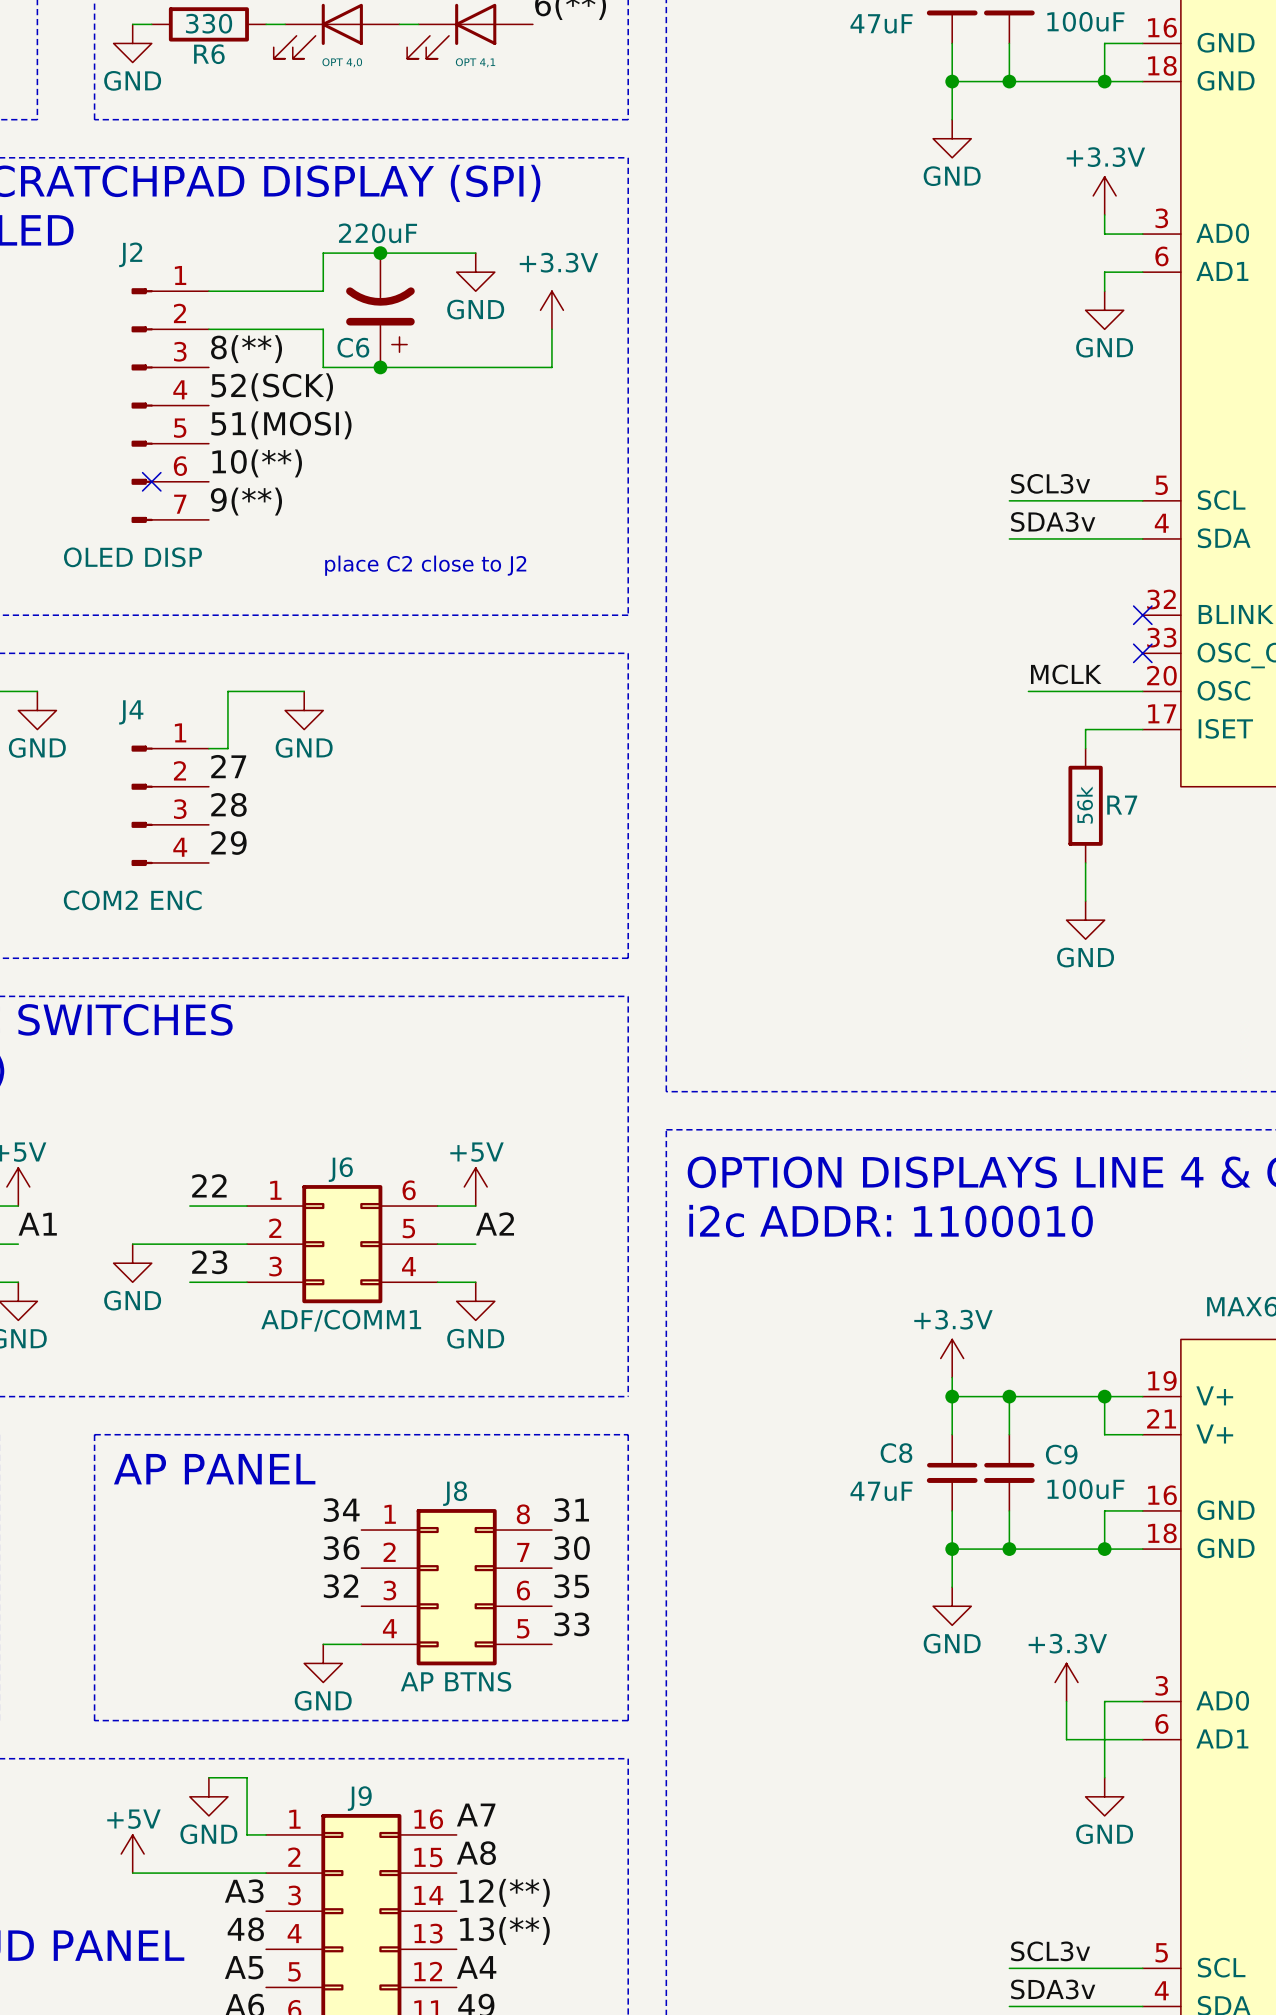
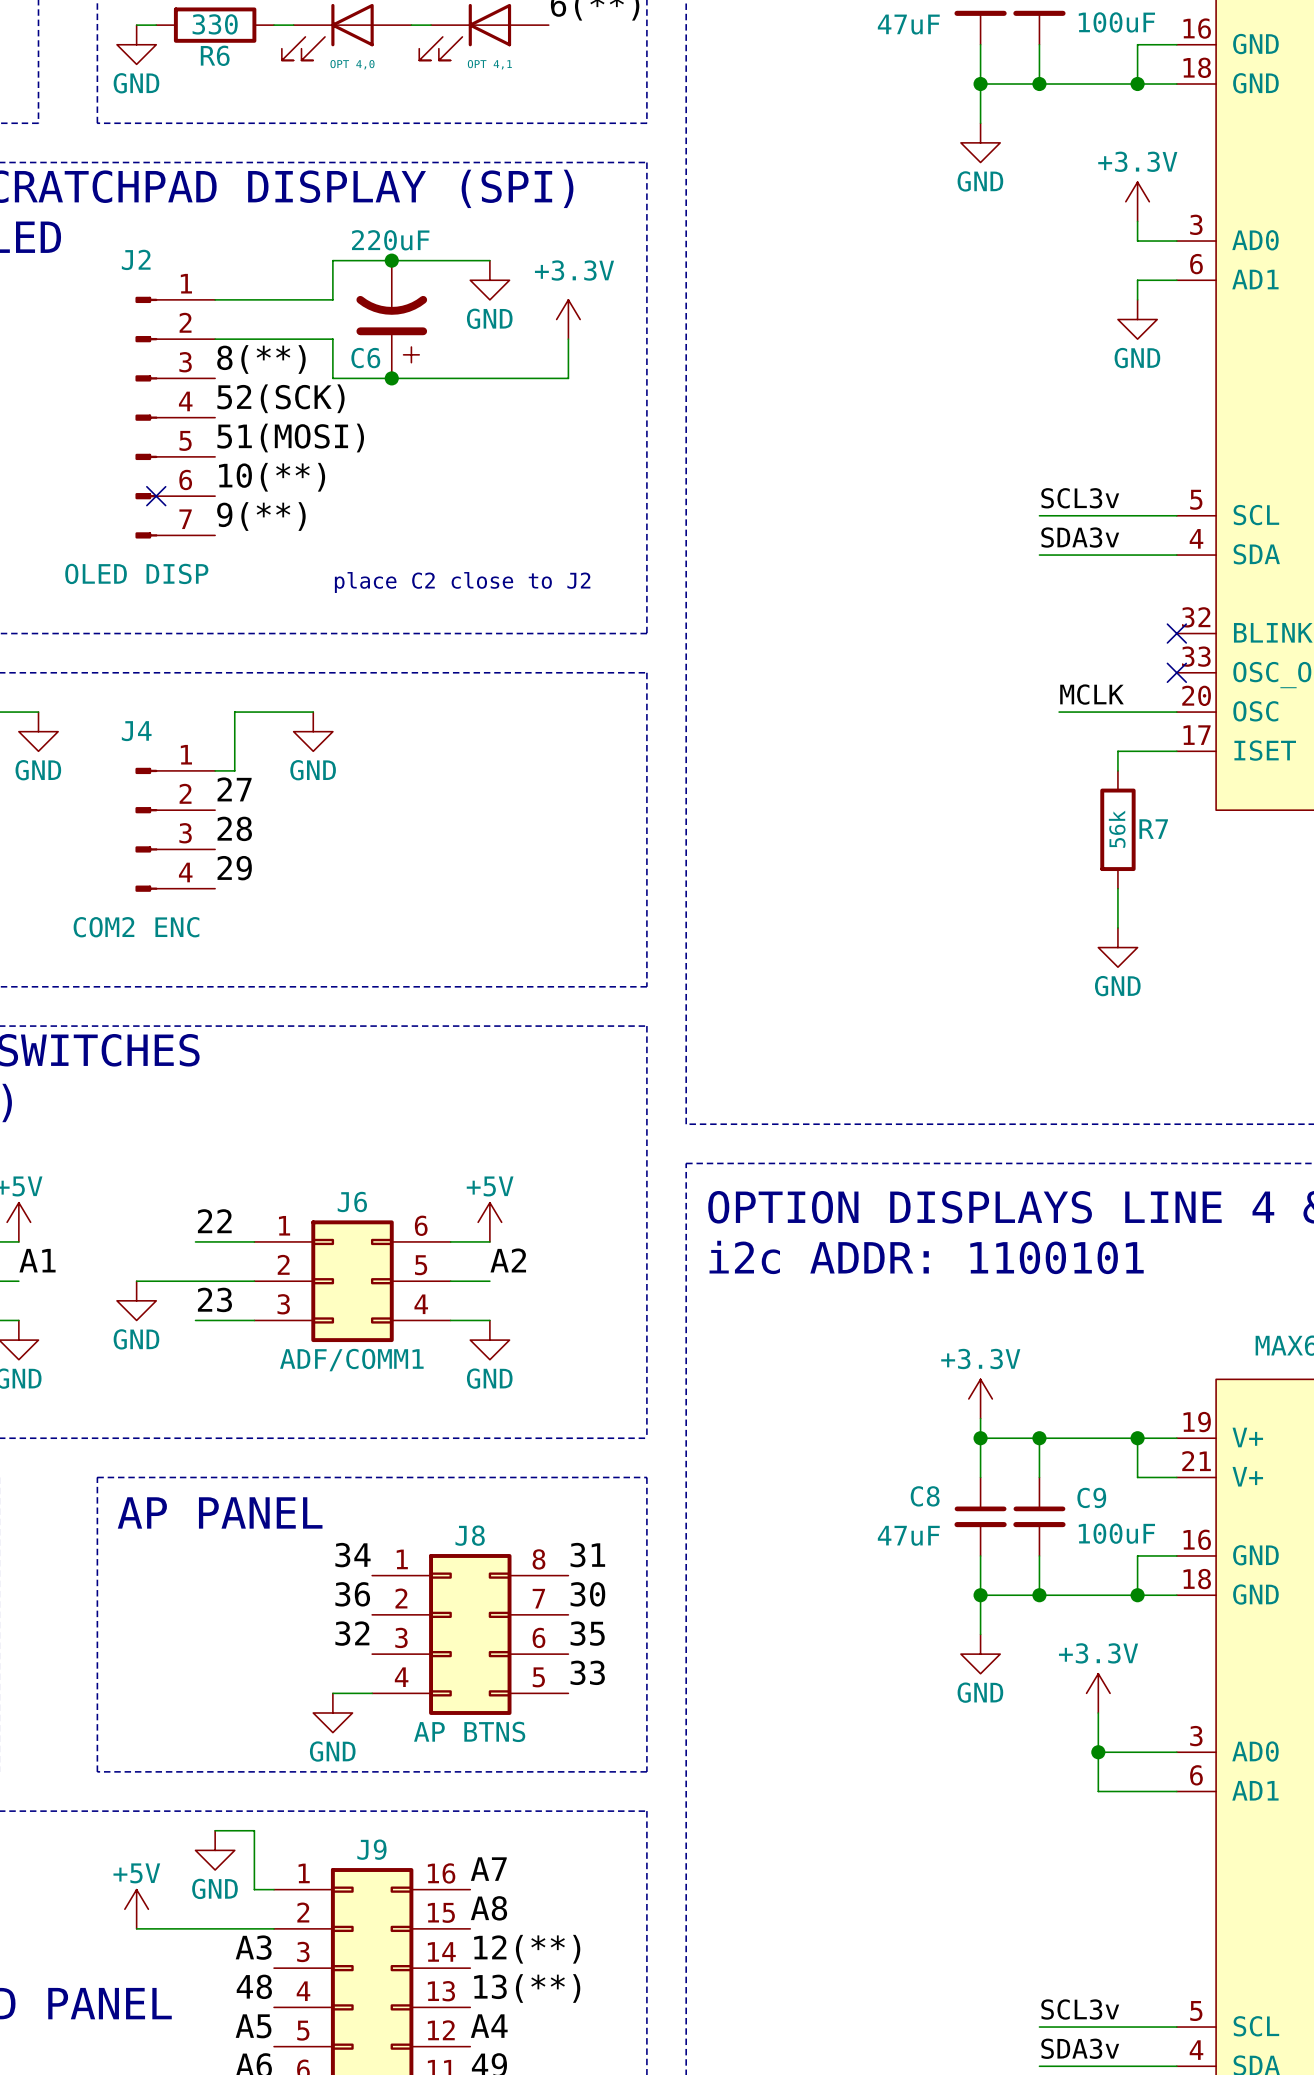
text: i2c ADDR: 1100010 (891, 1221) -> i2c ADDR: 1100101 (926, 1257)
power symbol position: +3.3V (1066, 1682) -> +3.3V (1098, 1693)
junction: none -> (1098, 1752)
wire: (1104, 1701) (1104, 1777) -> (1137, 1752) (1098, 1752) (1098, 1712)
power symbol: GND (1104, 1796) -> none

